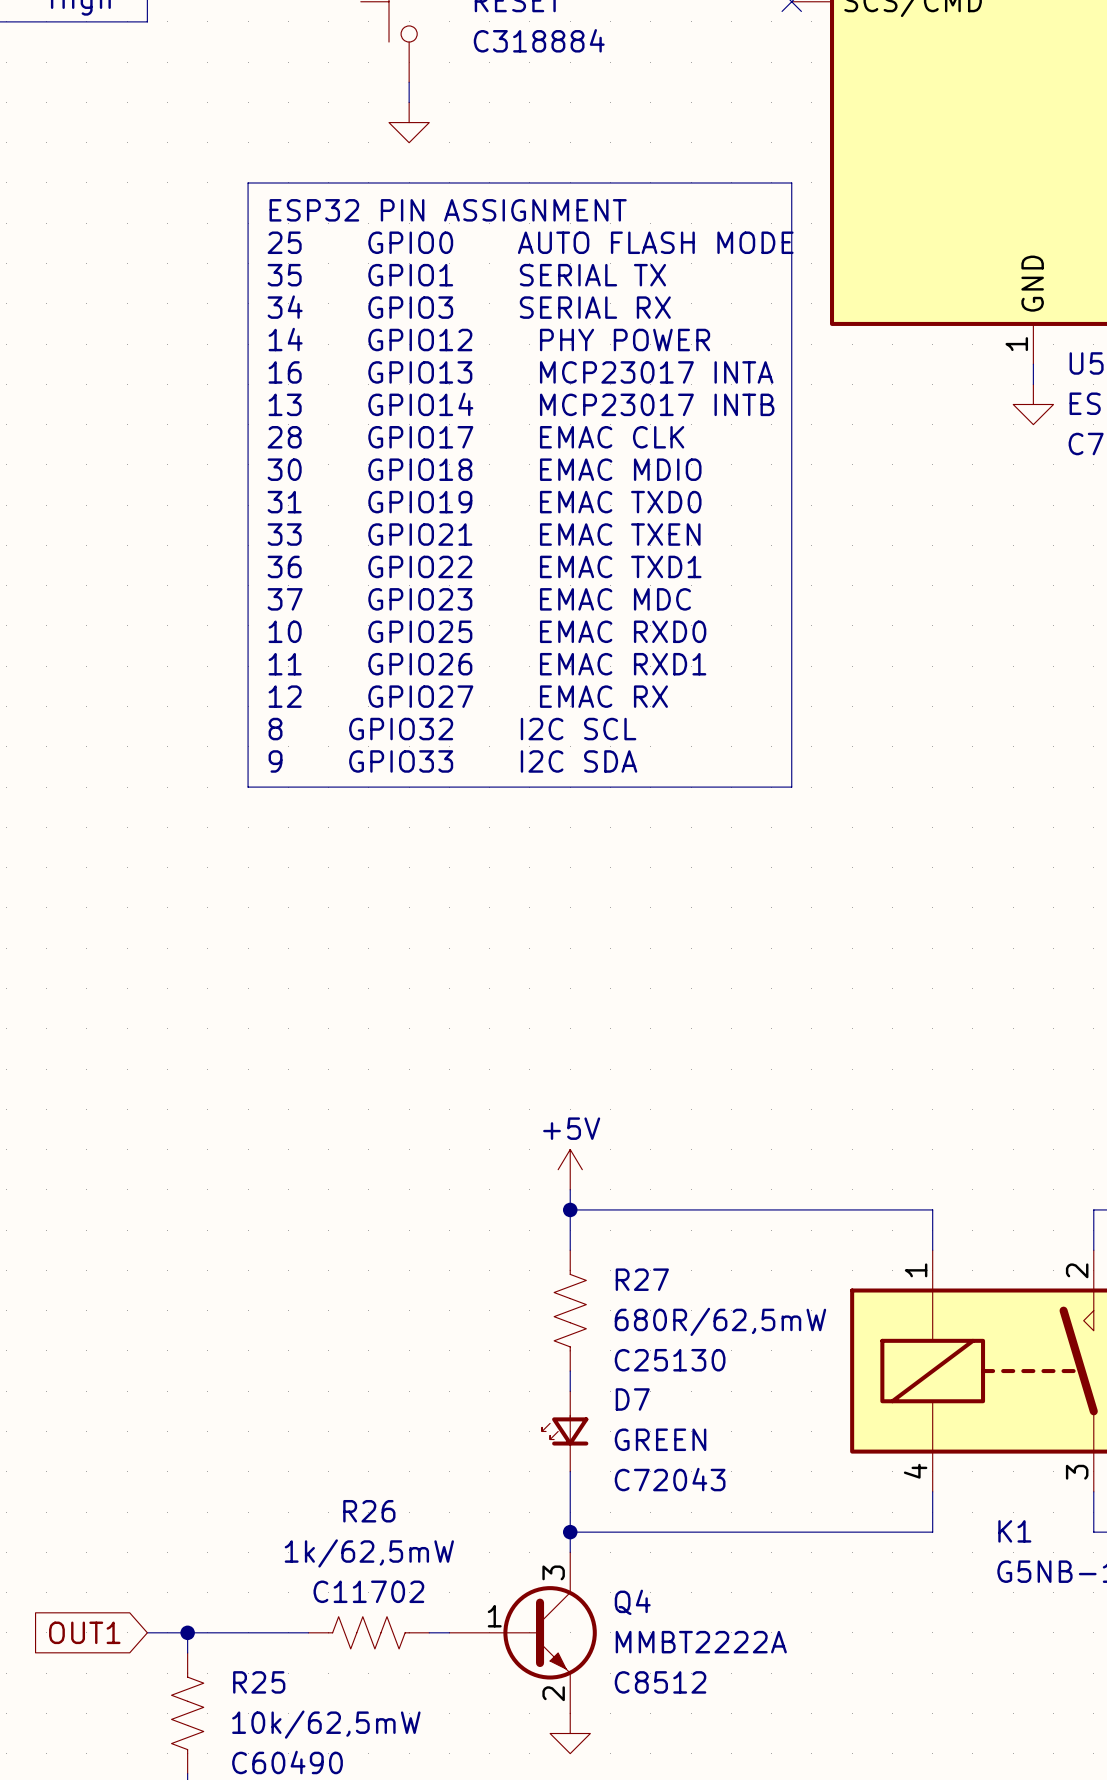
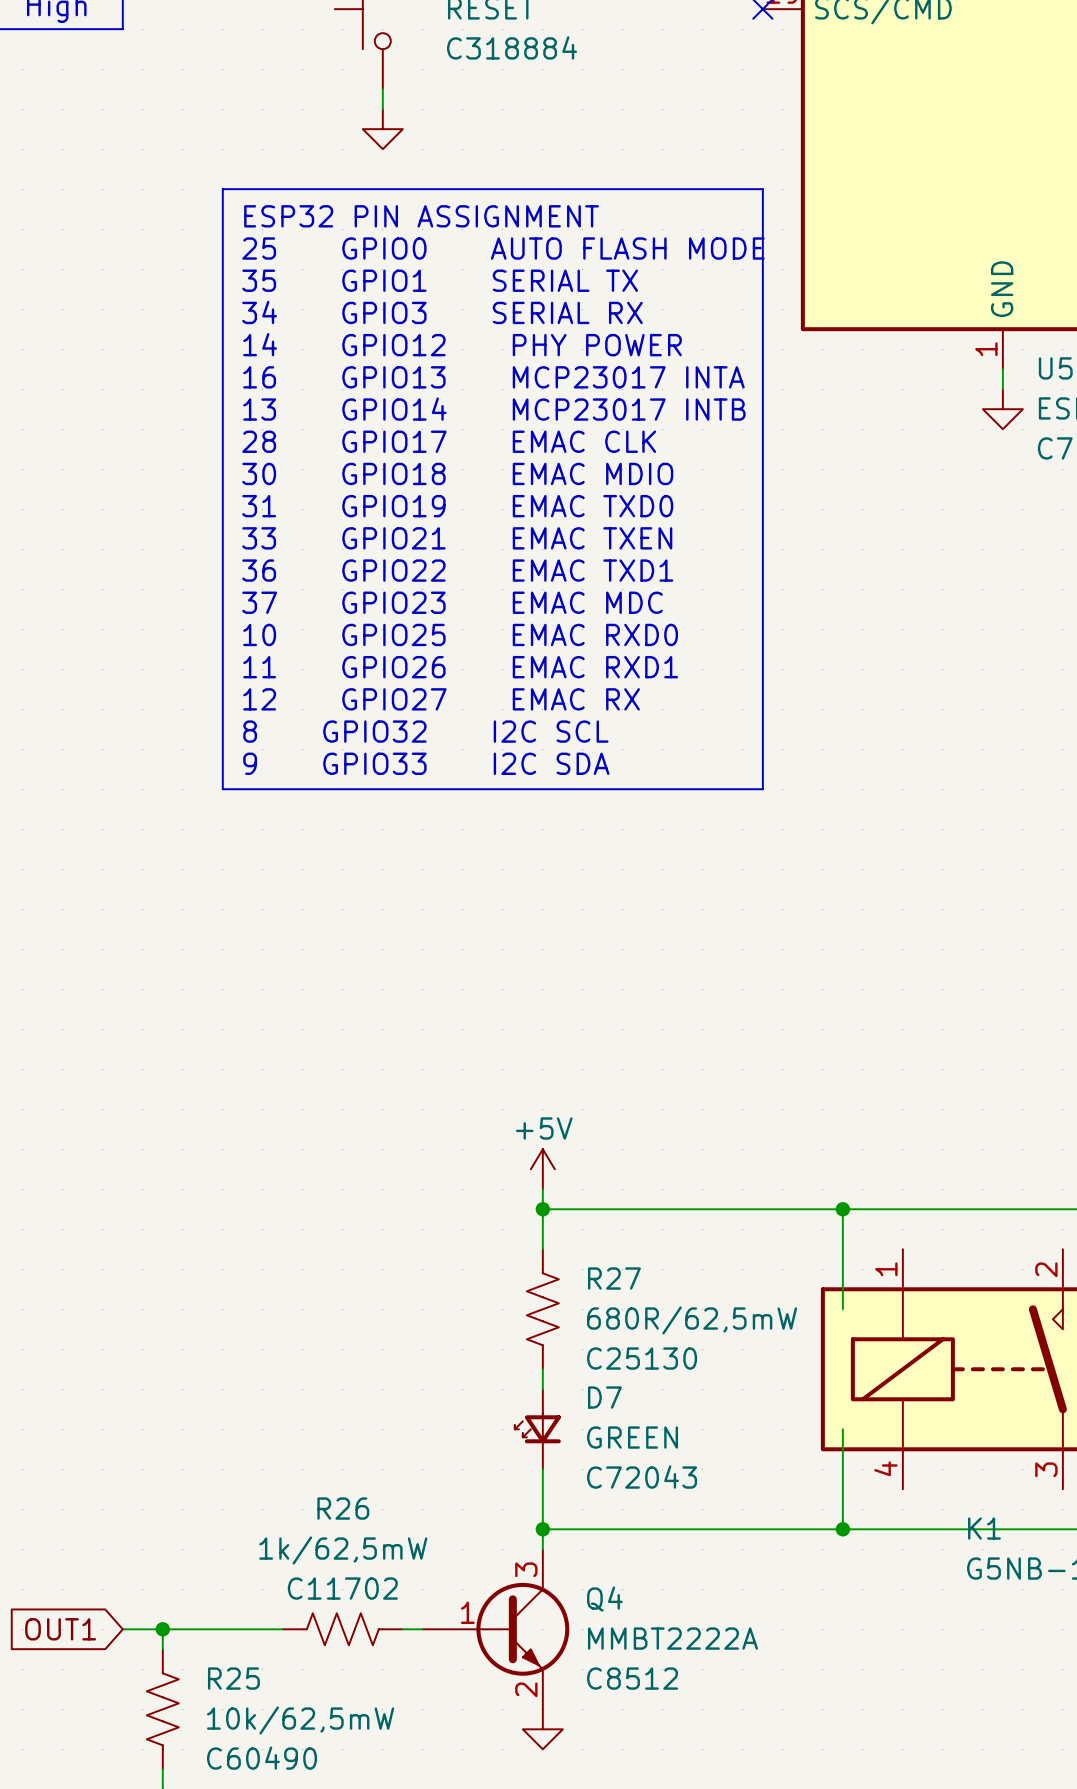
wire: none -> (842, 1209) (842, 1309)
junction: none -> (842, 1209)
wire: (932, 1209) (932, 1250) -> (902, 1209) (1062, 1209)
wire: (1093, 1209) (1093, 1250) -> none
wire: none -> (842, 1429) (842, 1529)
wire: (932, 1491) (932, 1532) -> (1062, 1529) (902, 1529)
wire: (1093, 1491) (1093, 1532) -> none
junction: none -> (842, 1529)

